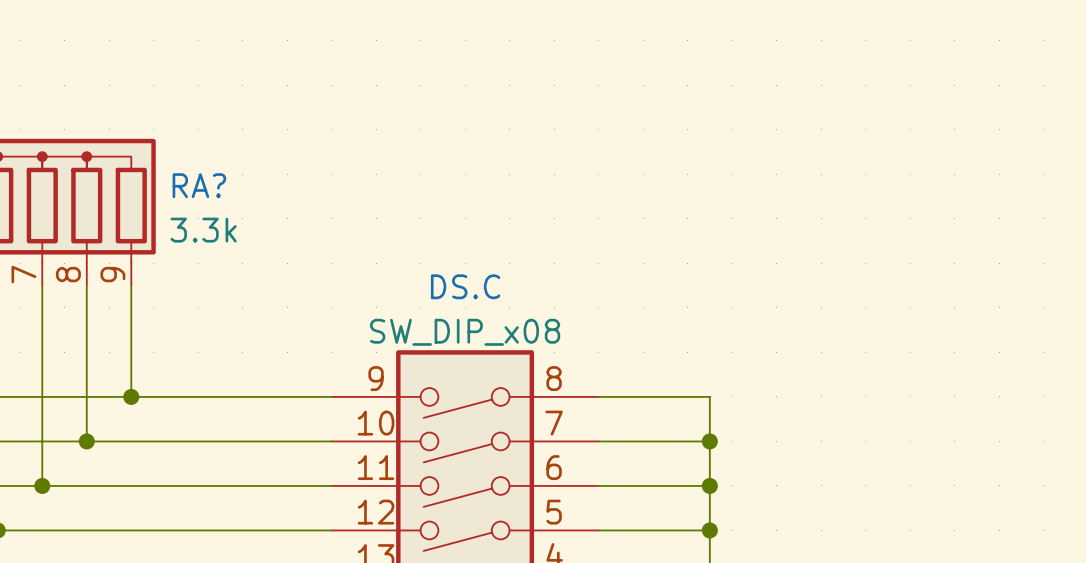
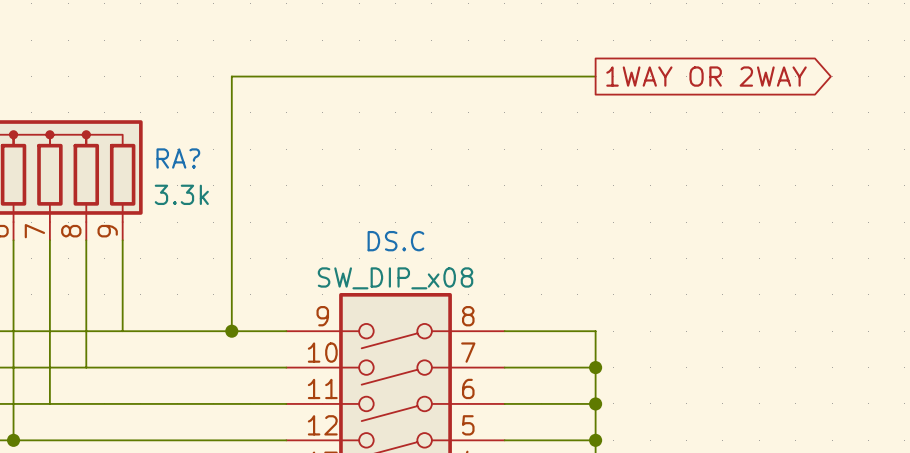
wire: none -> (595, 76) (231, 76) (231, 331)
global label: none -> 1WAY OR 2WAY (706, 76)
junction: (131, 396) -> none
junction: none -> (231, 331)
junction: (86, 441) -> none
junction: (42, 485) -> none

